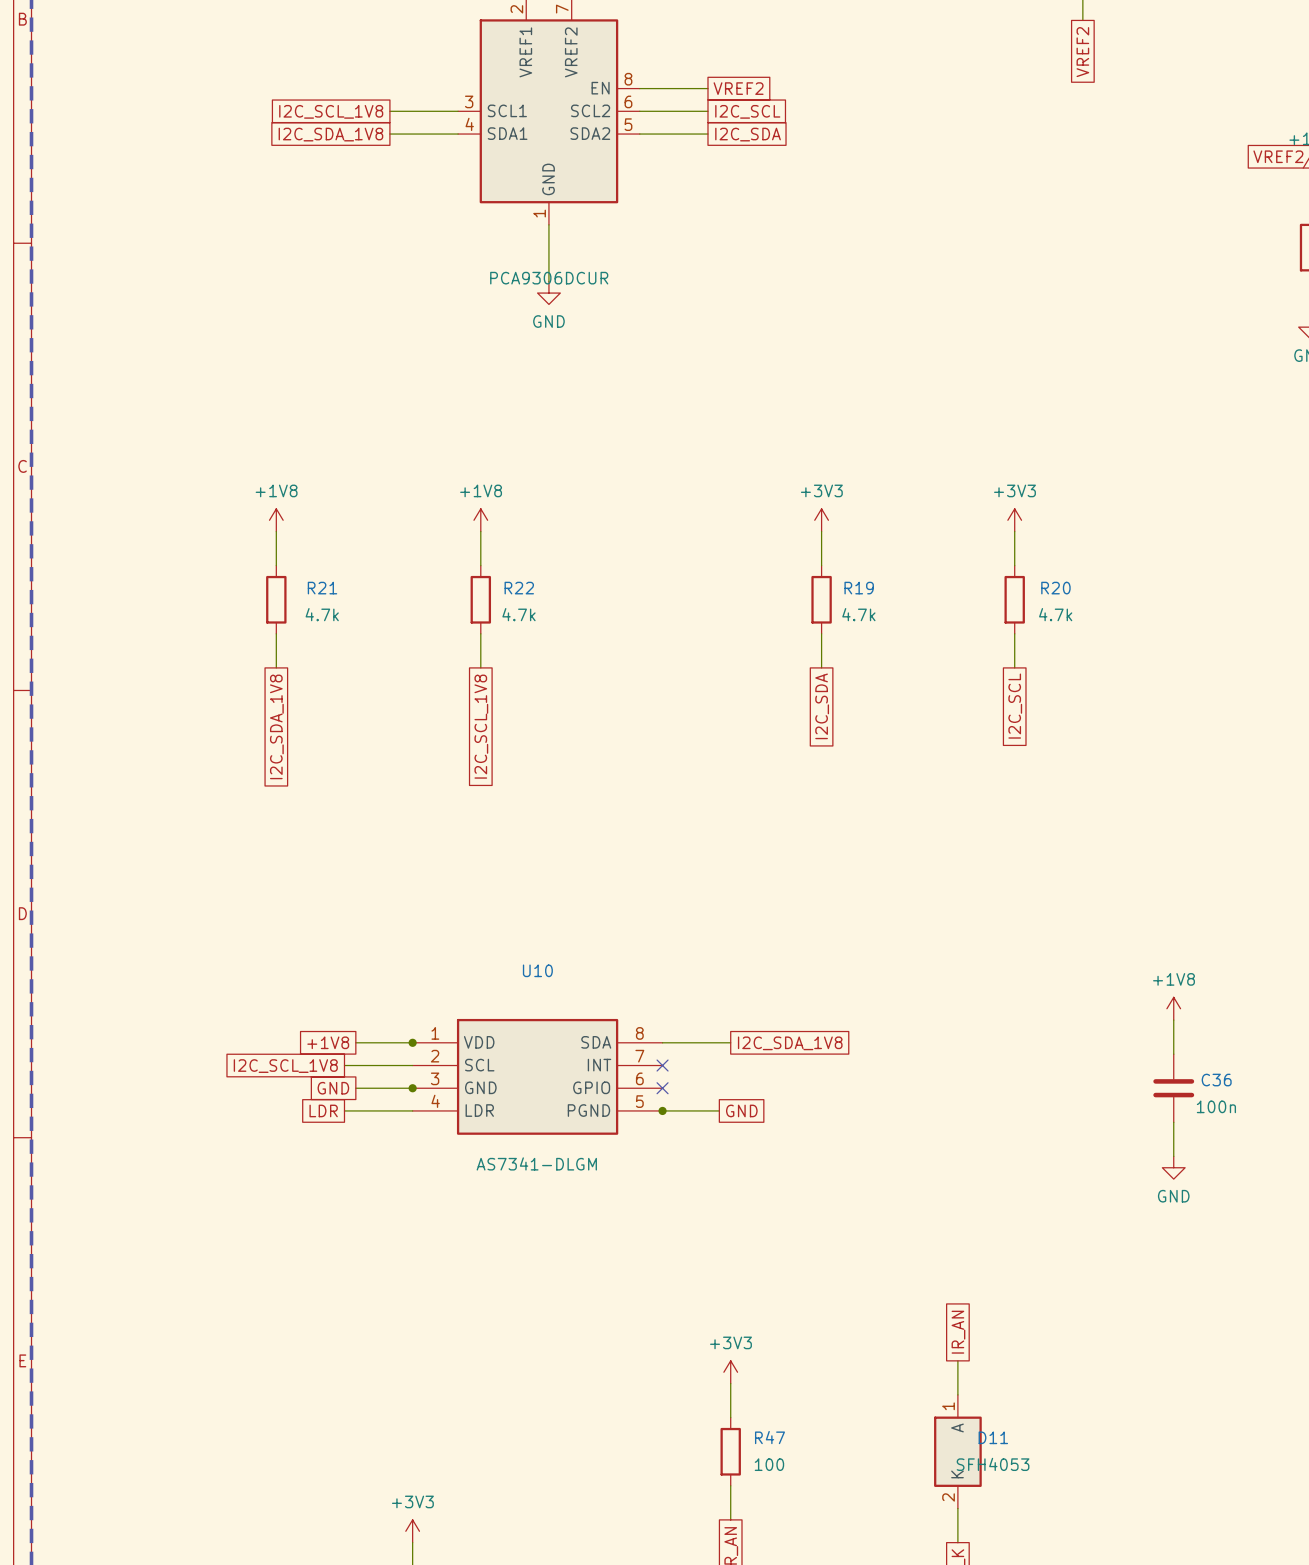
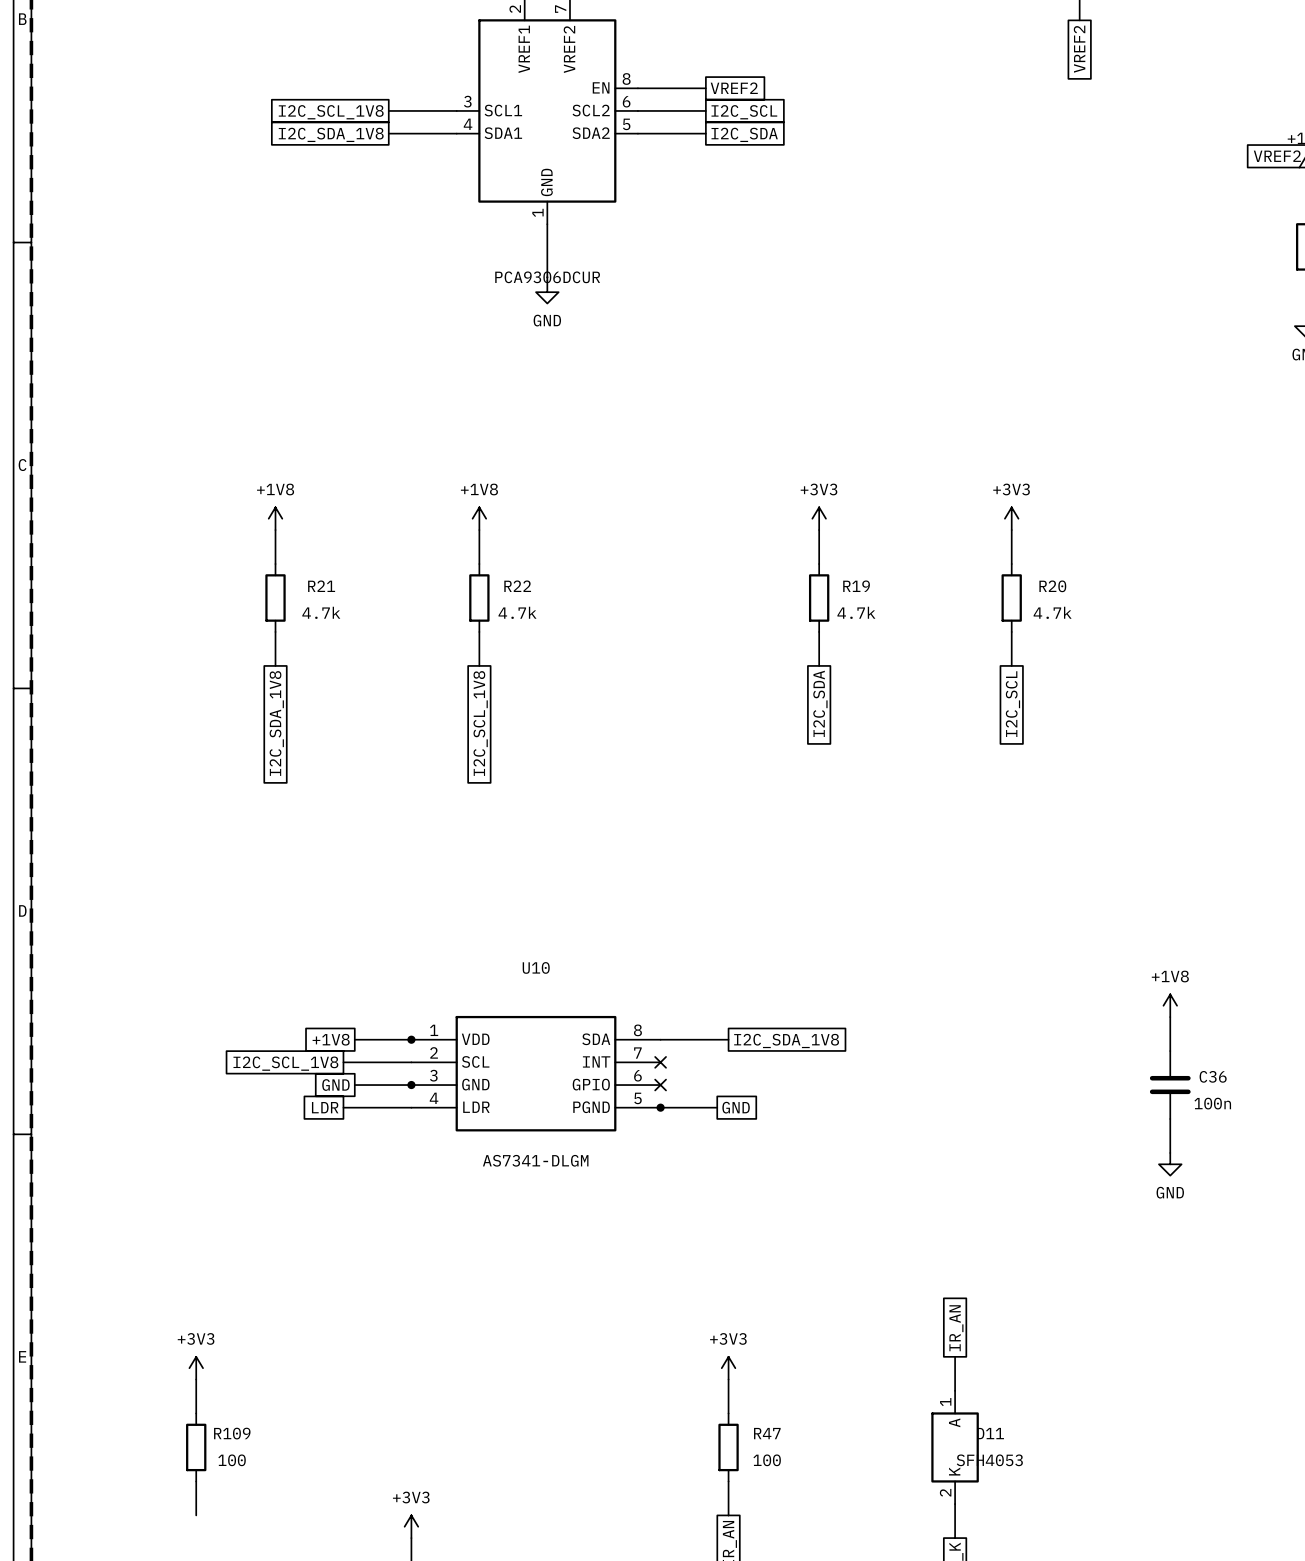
power symbol: none -> +3V3 (196, 1368)
wire: none -> (196, 1379) (196, 1413)
R109: none -> 100 (196, 1447)
wire: none -> (196, 1481) (196, 1515)

